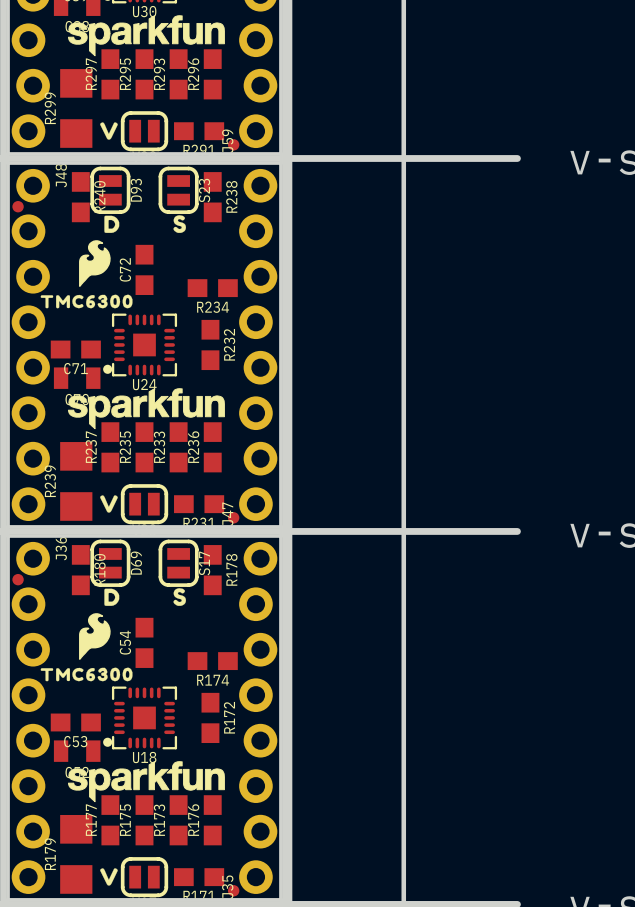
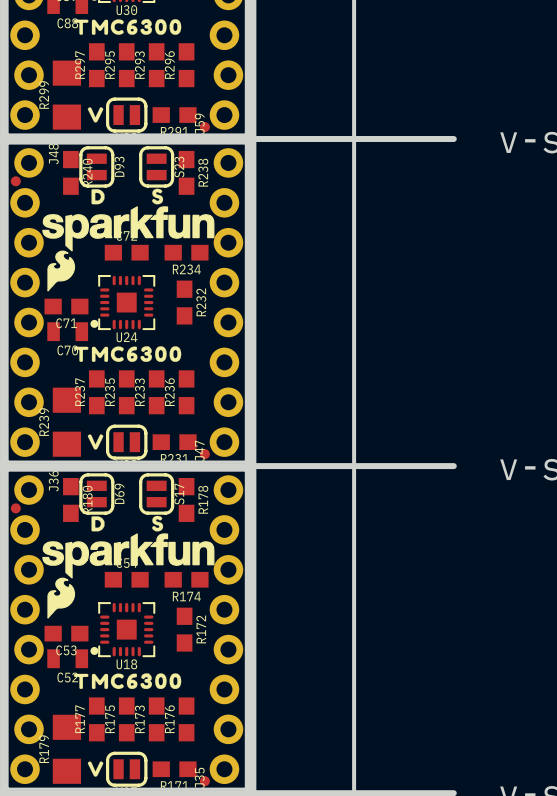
drawing shape: [67, 15, 225, 57] -> [73, 19, 182, 35]
drawing: none -> [42, 206, 215, 252]
drawing position: (94, 263) -> (61, 271)
C72 rotation: 0° (144, 269) -> 90° clockwise (126, 252)
drawing: [40, 294, 133, 309] -> none
drawing shape: [67, 388, 225, 430] -> [73, 346, 182, 362]
drawing: none -> [42, 533, 215, 579]
drawing position: (94, 636) -> (61, 598)
C54 rotation: 0° (144, 642) -> 90° clockwise (126, 579)
drawing: [40, 667, 133, 682] -> none
drawing shape: [67, 761, 225, 803] -> [73, 673, 182, 689]

